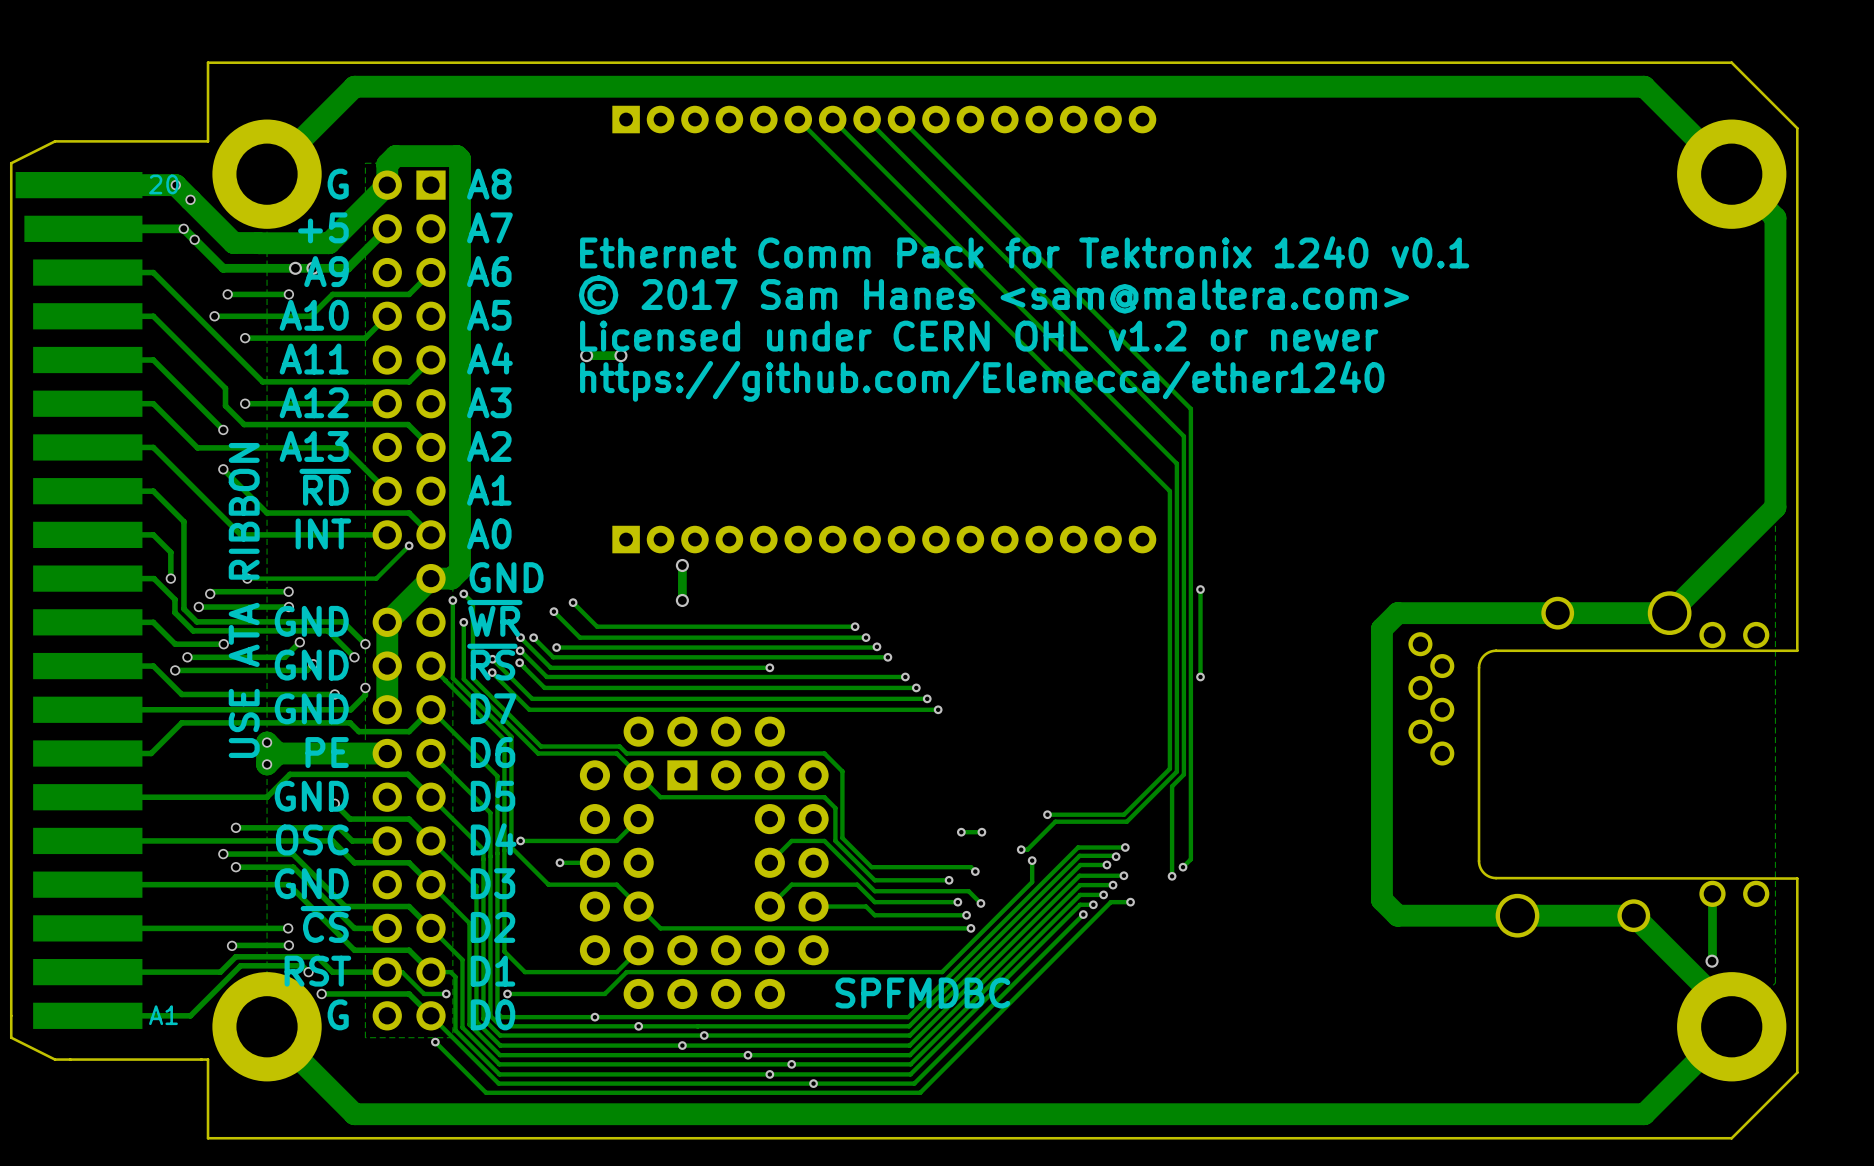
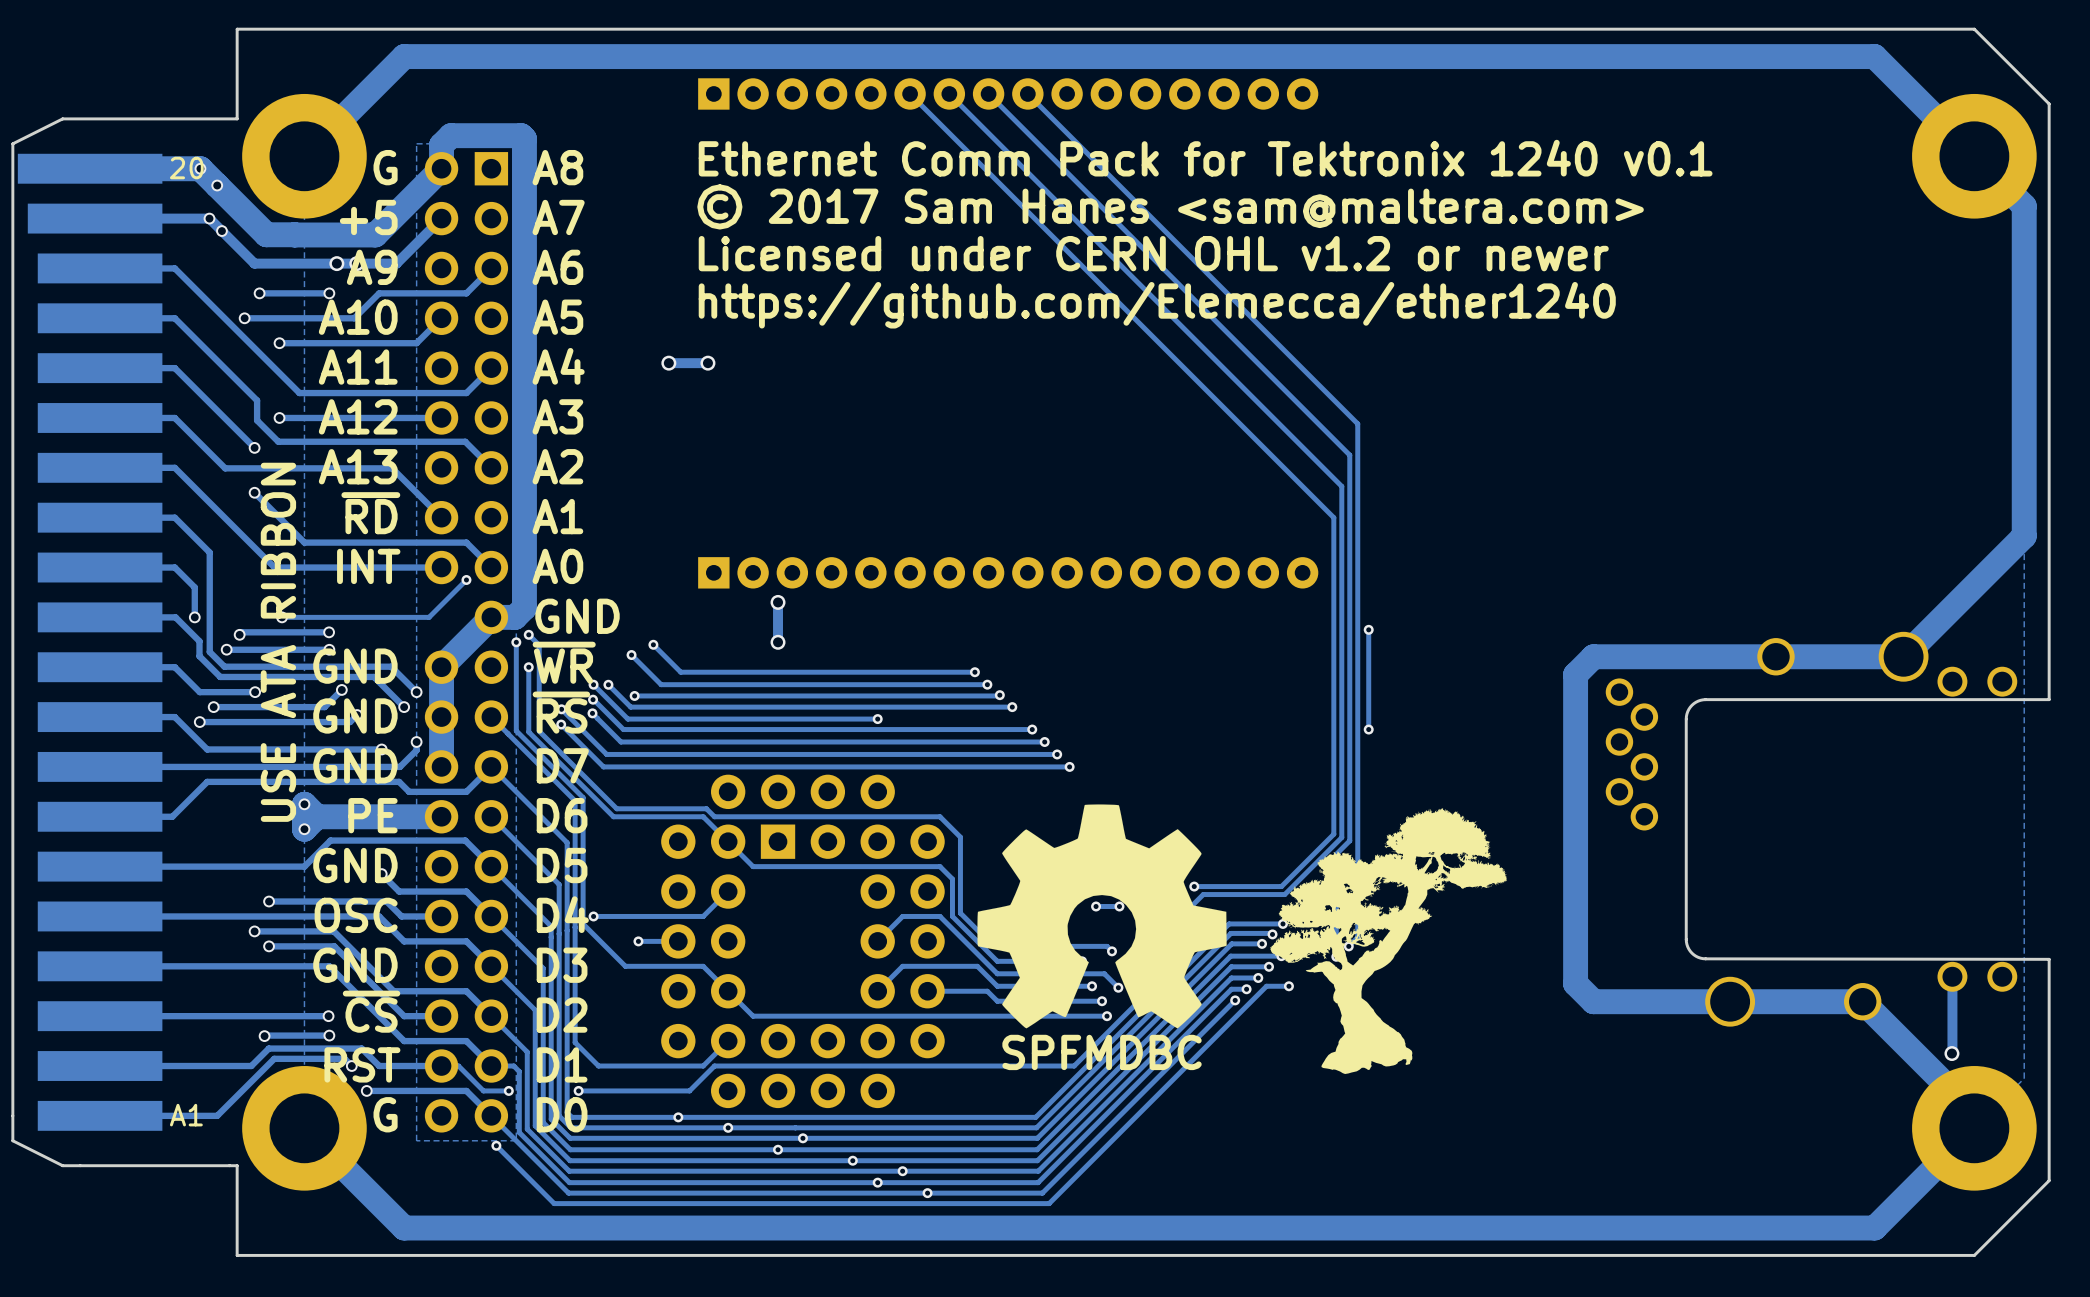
text position: Ethernet Comm Pack for Tektronix 1240 v0.1 (1024, 252) -> Ethernet Comm Pack for Tektronix 1240 v0.1 (1205, 158)
text position: © 2017 Sam Hanes <sam@maltera.com> (993, 295) -> © 2017 Sam Hanes <sam@maltera.com> (1170, 206)
text position: Licensed under CERN OHL v1.2 or newer (979, 336) -> Licensed under CERN OHL v1.2 or newer (1153, 253)
text position: https://github.com/Elemecca/ether1240 (982, 381) -> https://github.com/Elemecca/ether1240 (1157, 305)
drawing: none -> [977, 804, 1227, 1029]
drawing: none -> [1270, 808, 1508, 1075]
text position: SPFMDBC (922, 993) -> SPFMDBC (1102, 1052)

